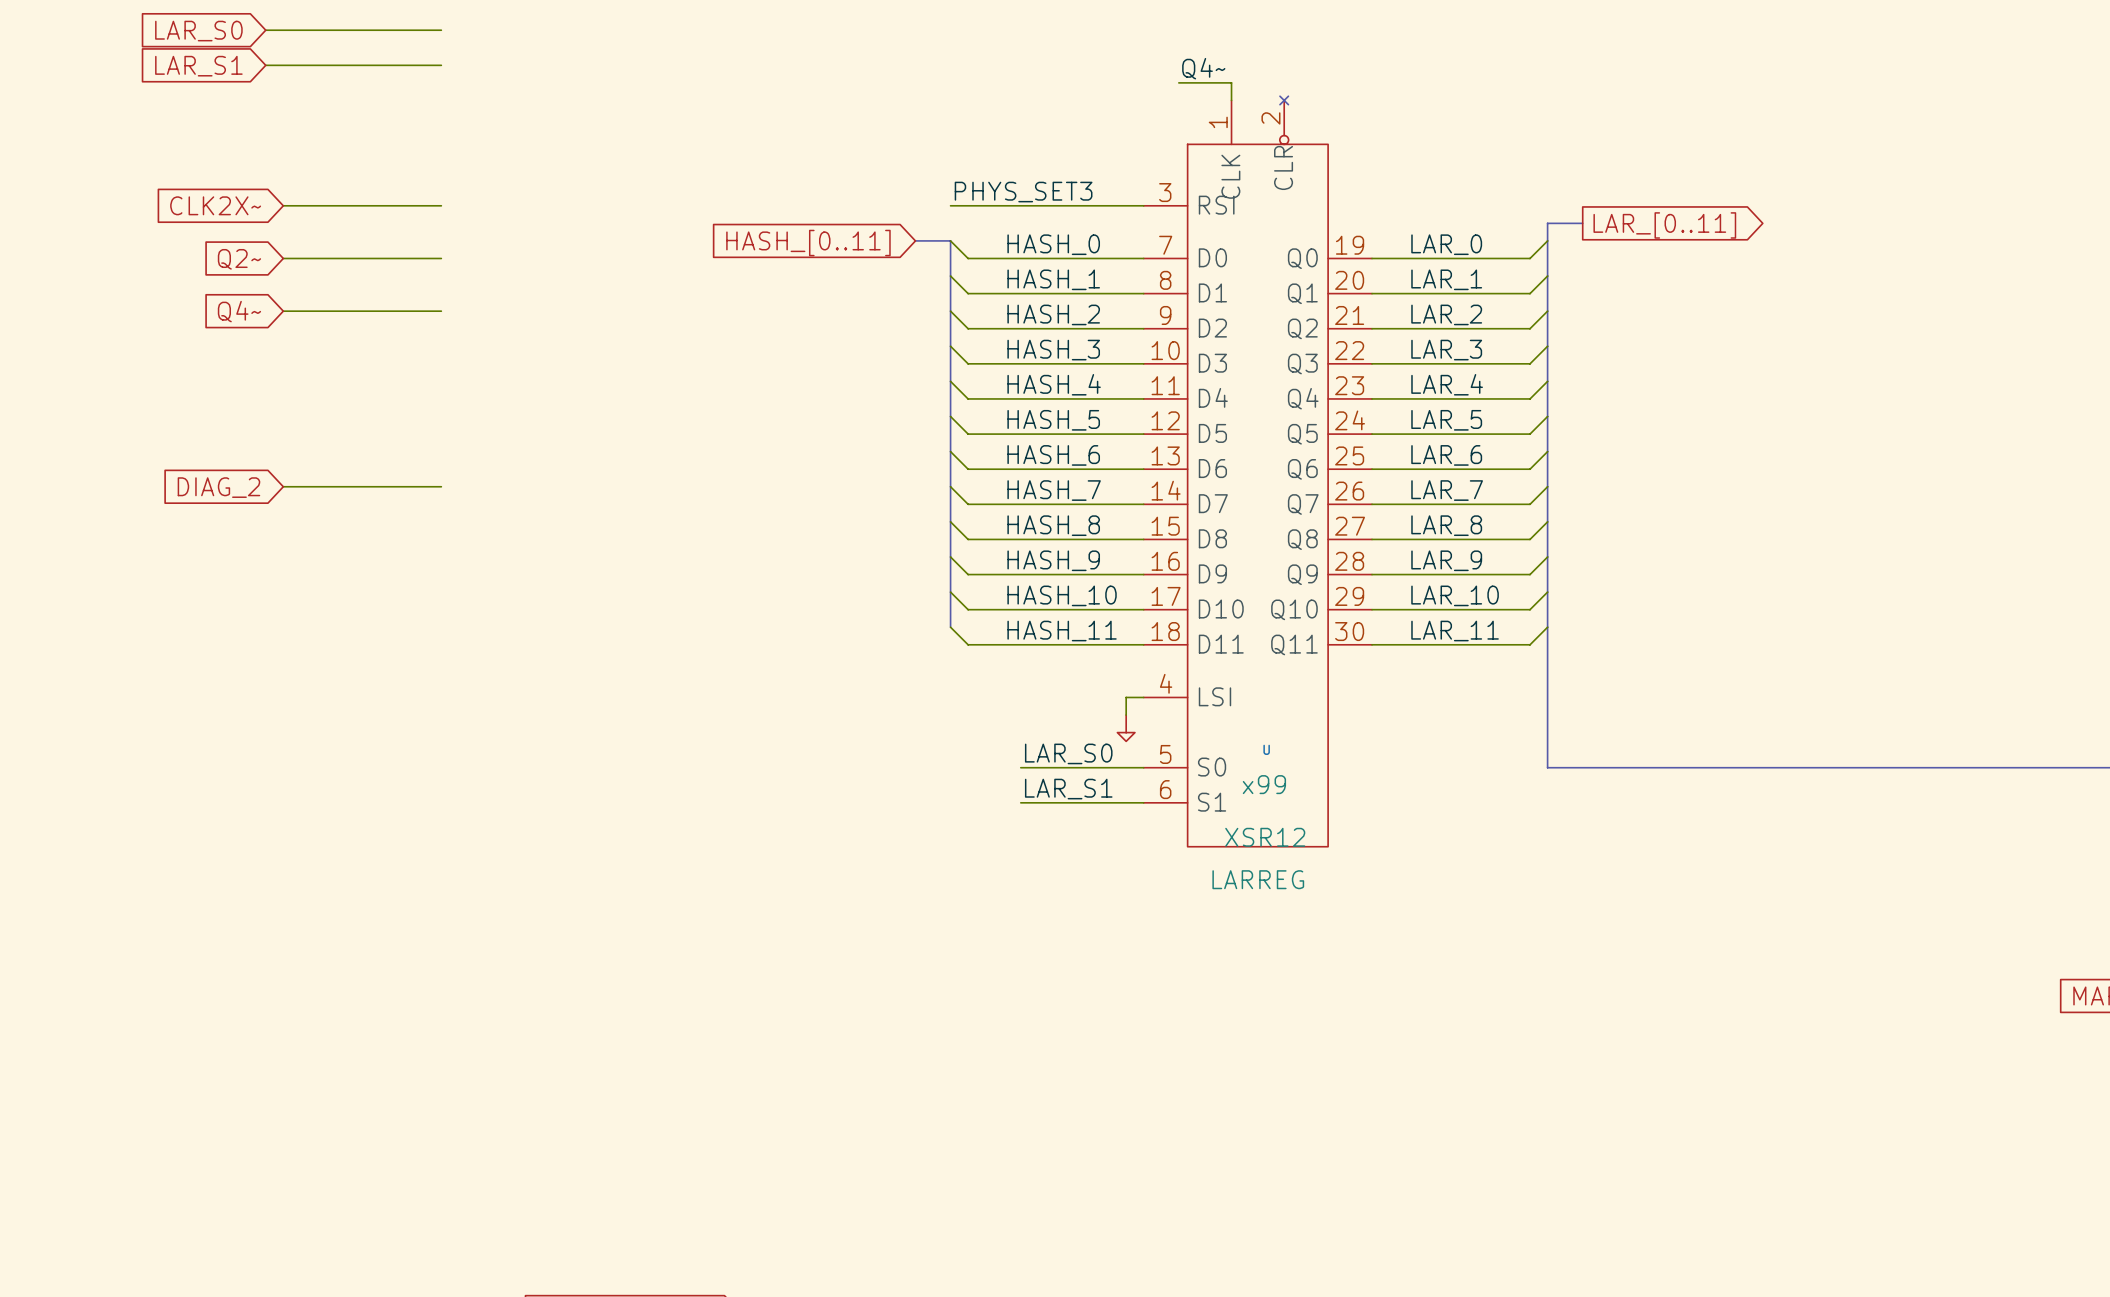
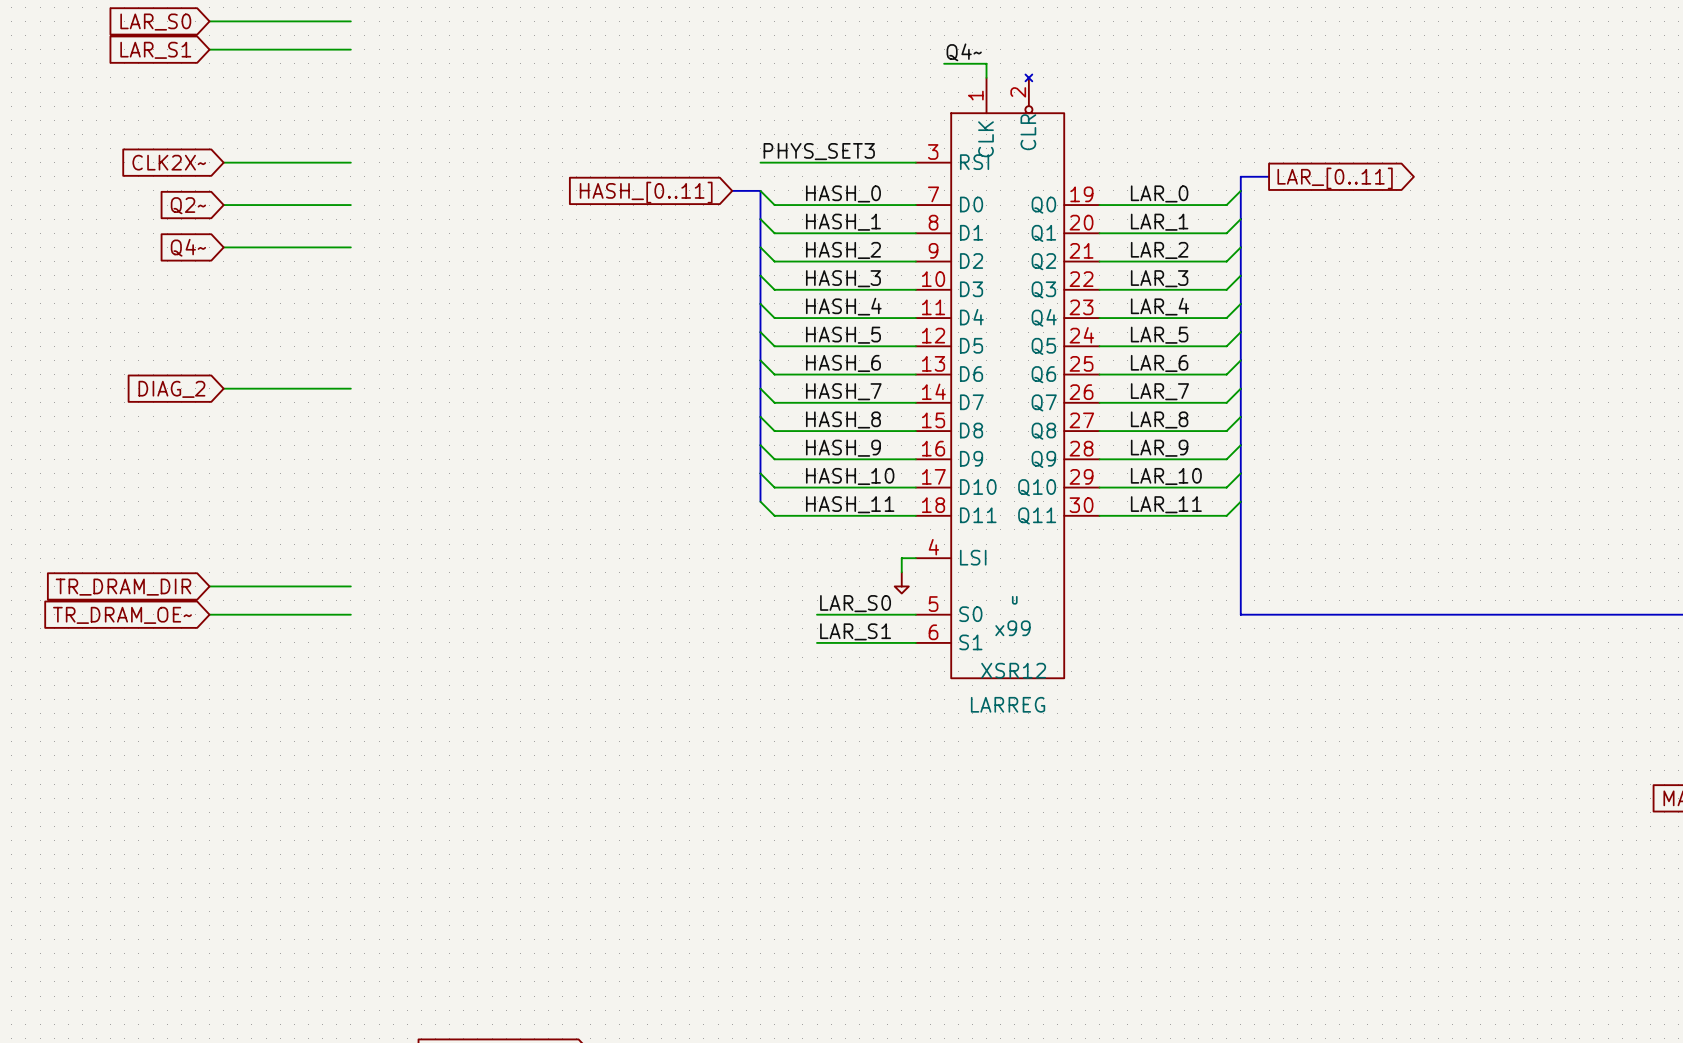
wire: none -> (209, 586) (350, 586)
global label: none -> TR_DRAM_DIR (123, 587)
wire: none -> (209, 614) (350, 614)
global label: none -> TR_DRAM_OE~ (122, 615)

